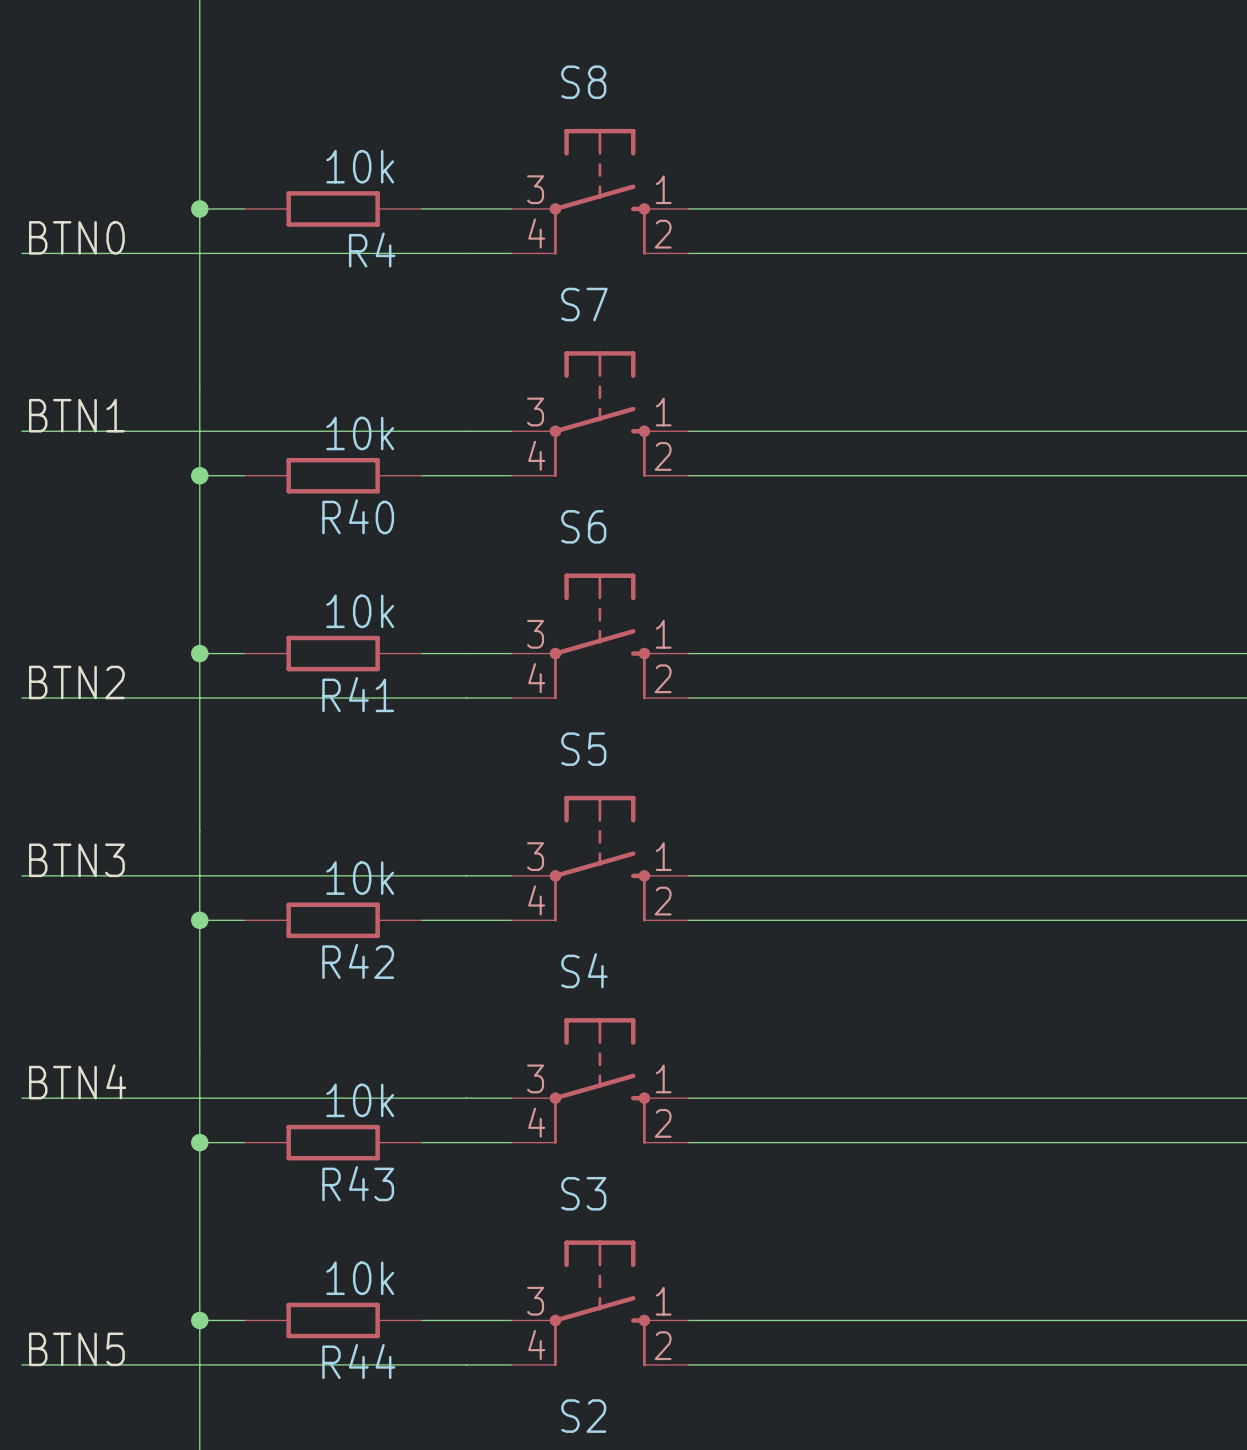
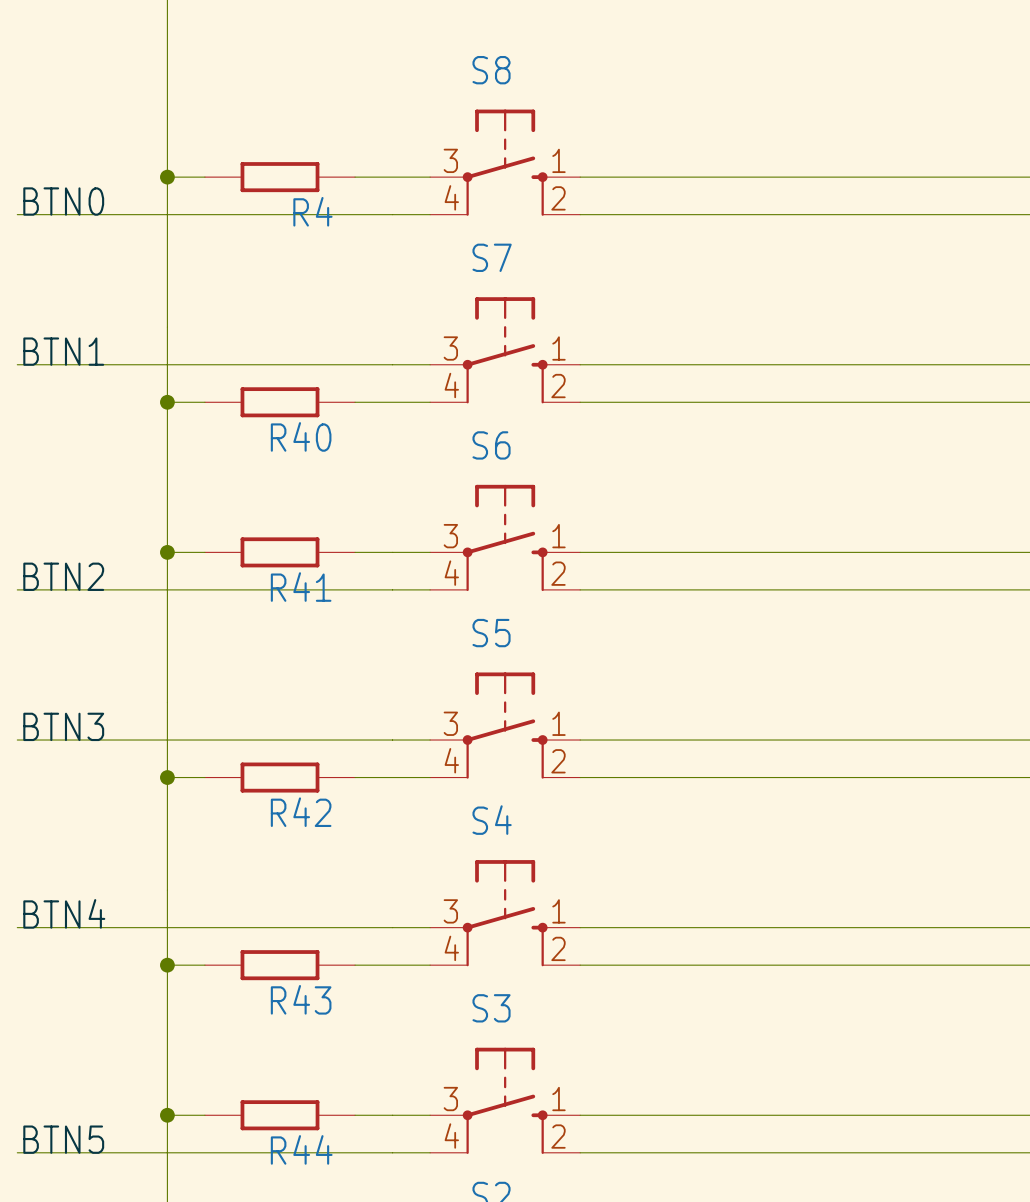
R4 value: 10k (360, 166) -> none
R40 value: 10k (360, 433) -> none
R41 value: 10k (360, 611) -> none
R42 value: 10k (360, 878) -> none
R43 value: 10k (360, 1100) -> none
R44 value: 10k (360, 1278) -> none

